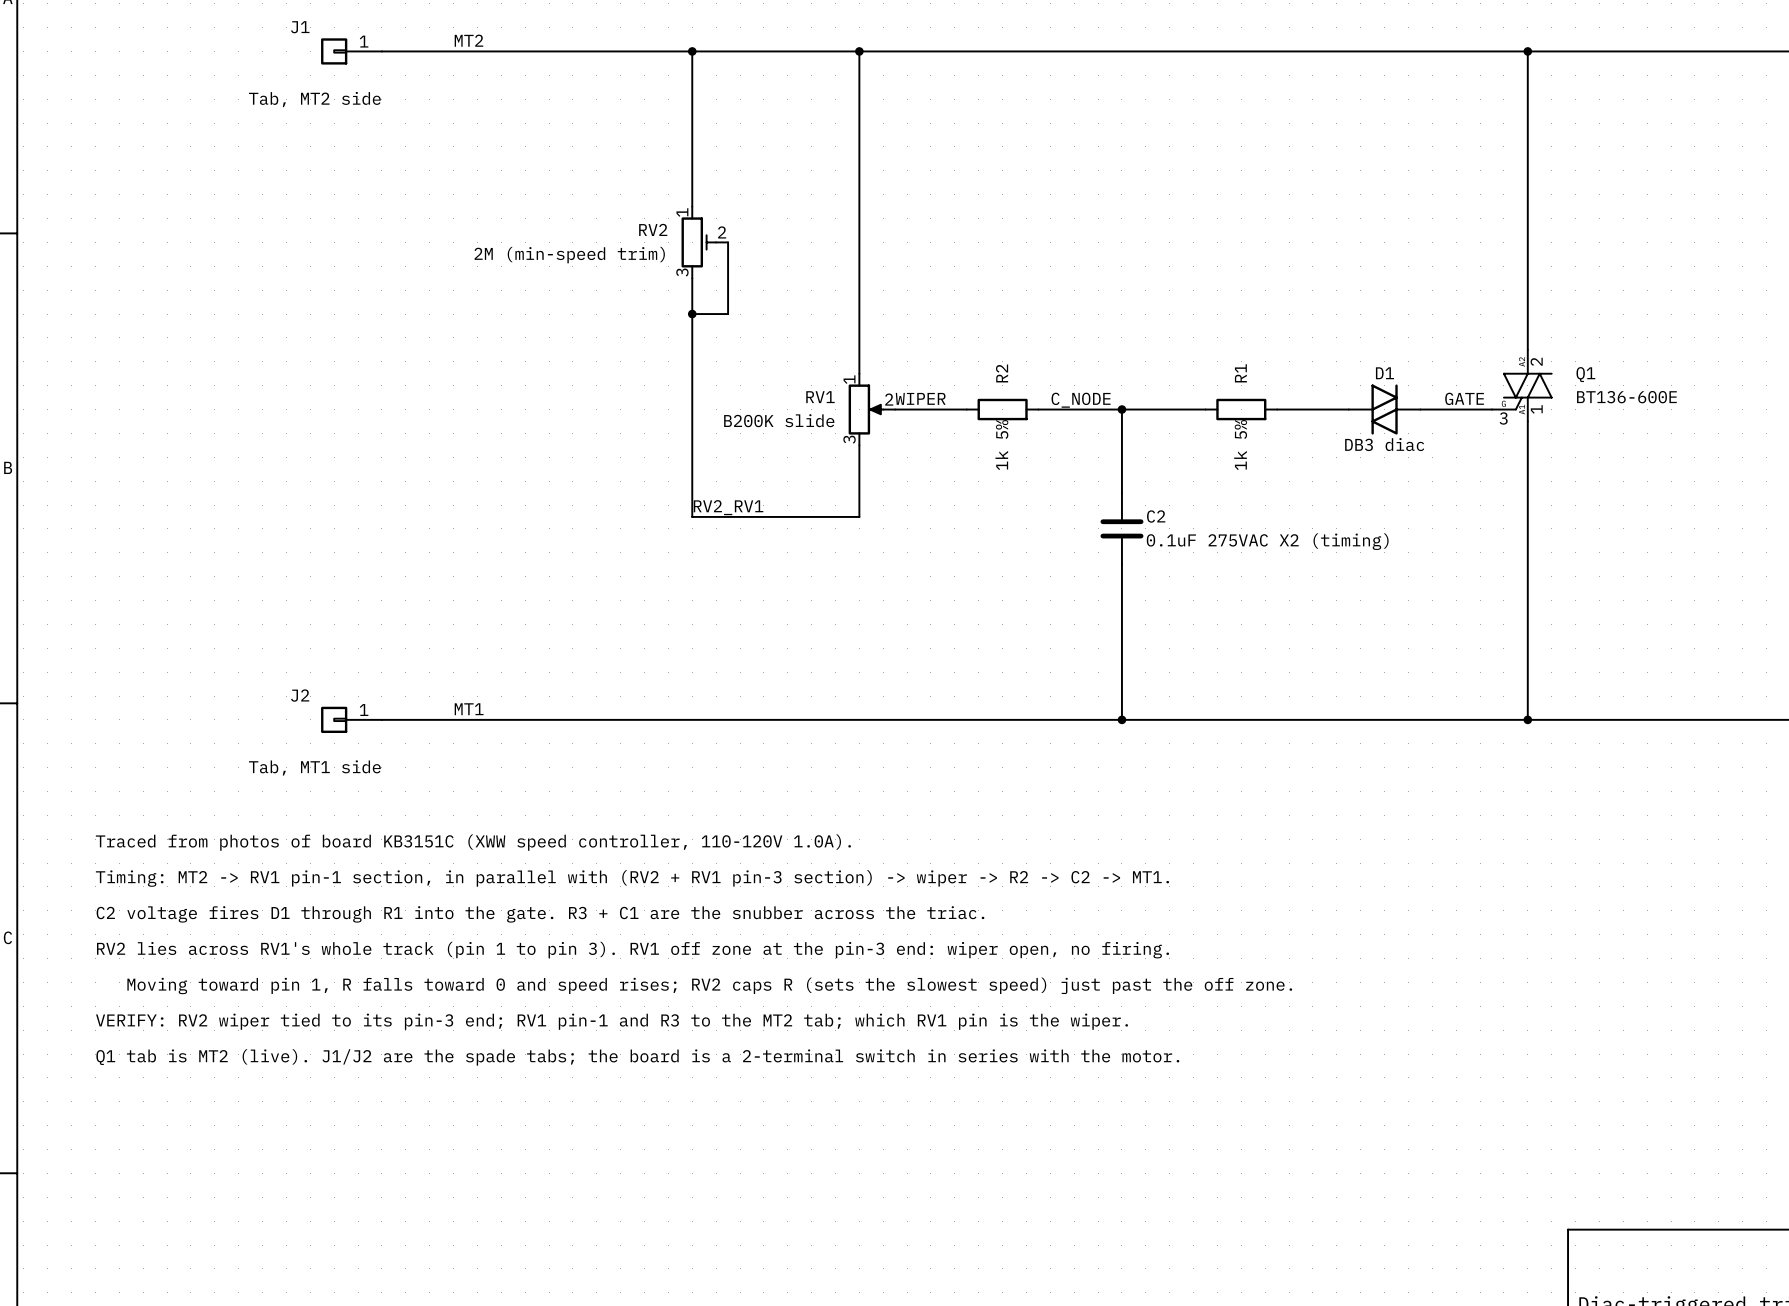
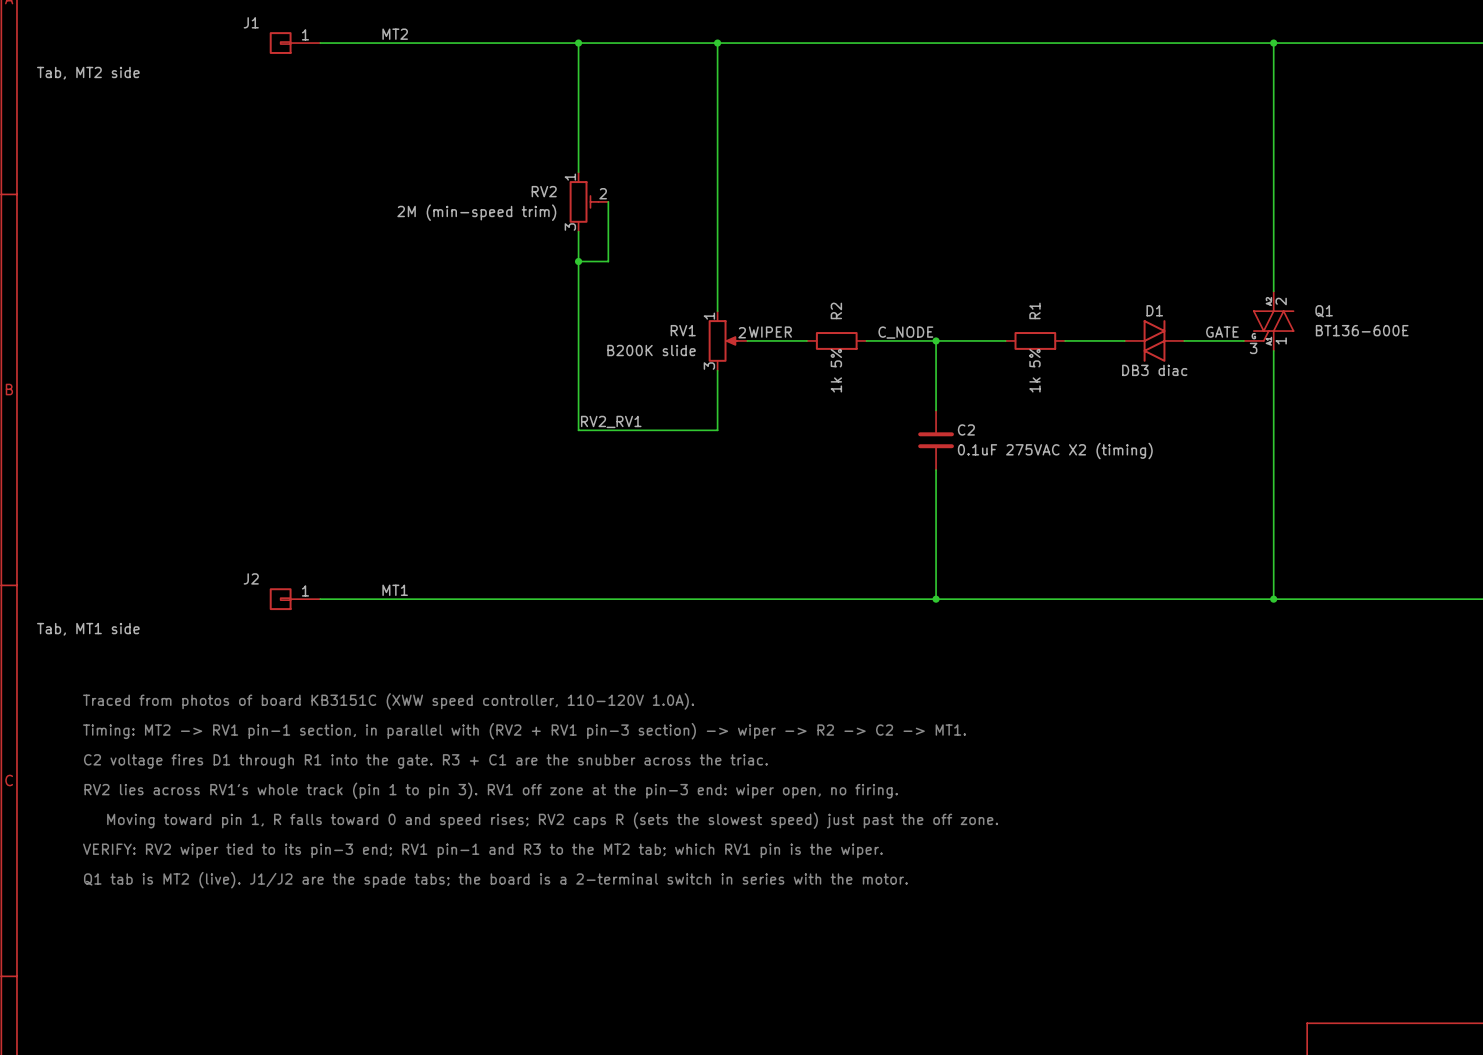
J1 value position: Tab, MT2 side (314, 99) -> Tab, MT2 side (88, 73)
J2 value position: Tab, MT1 side (314, 767) -> Tab, MT1 side (88, 629)

